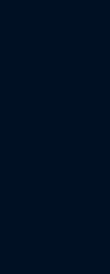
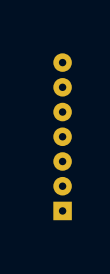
part: none -> (62, 136)

